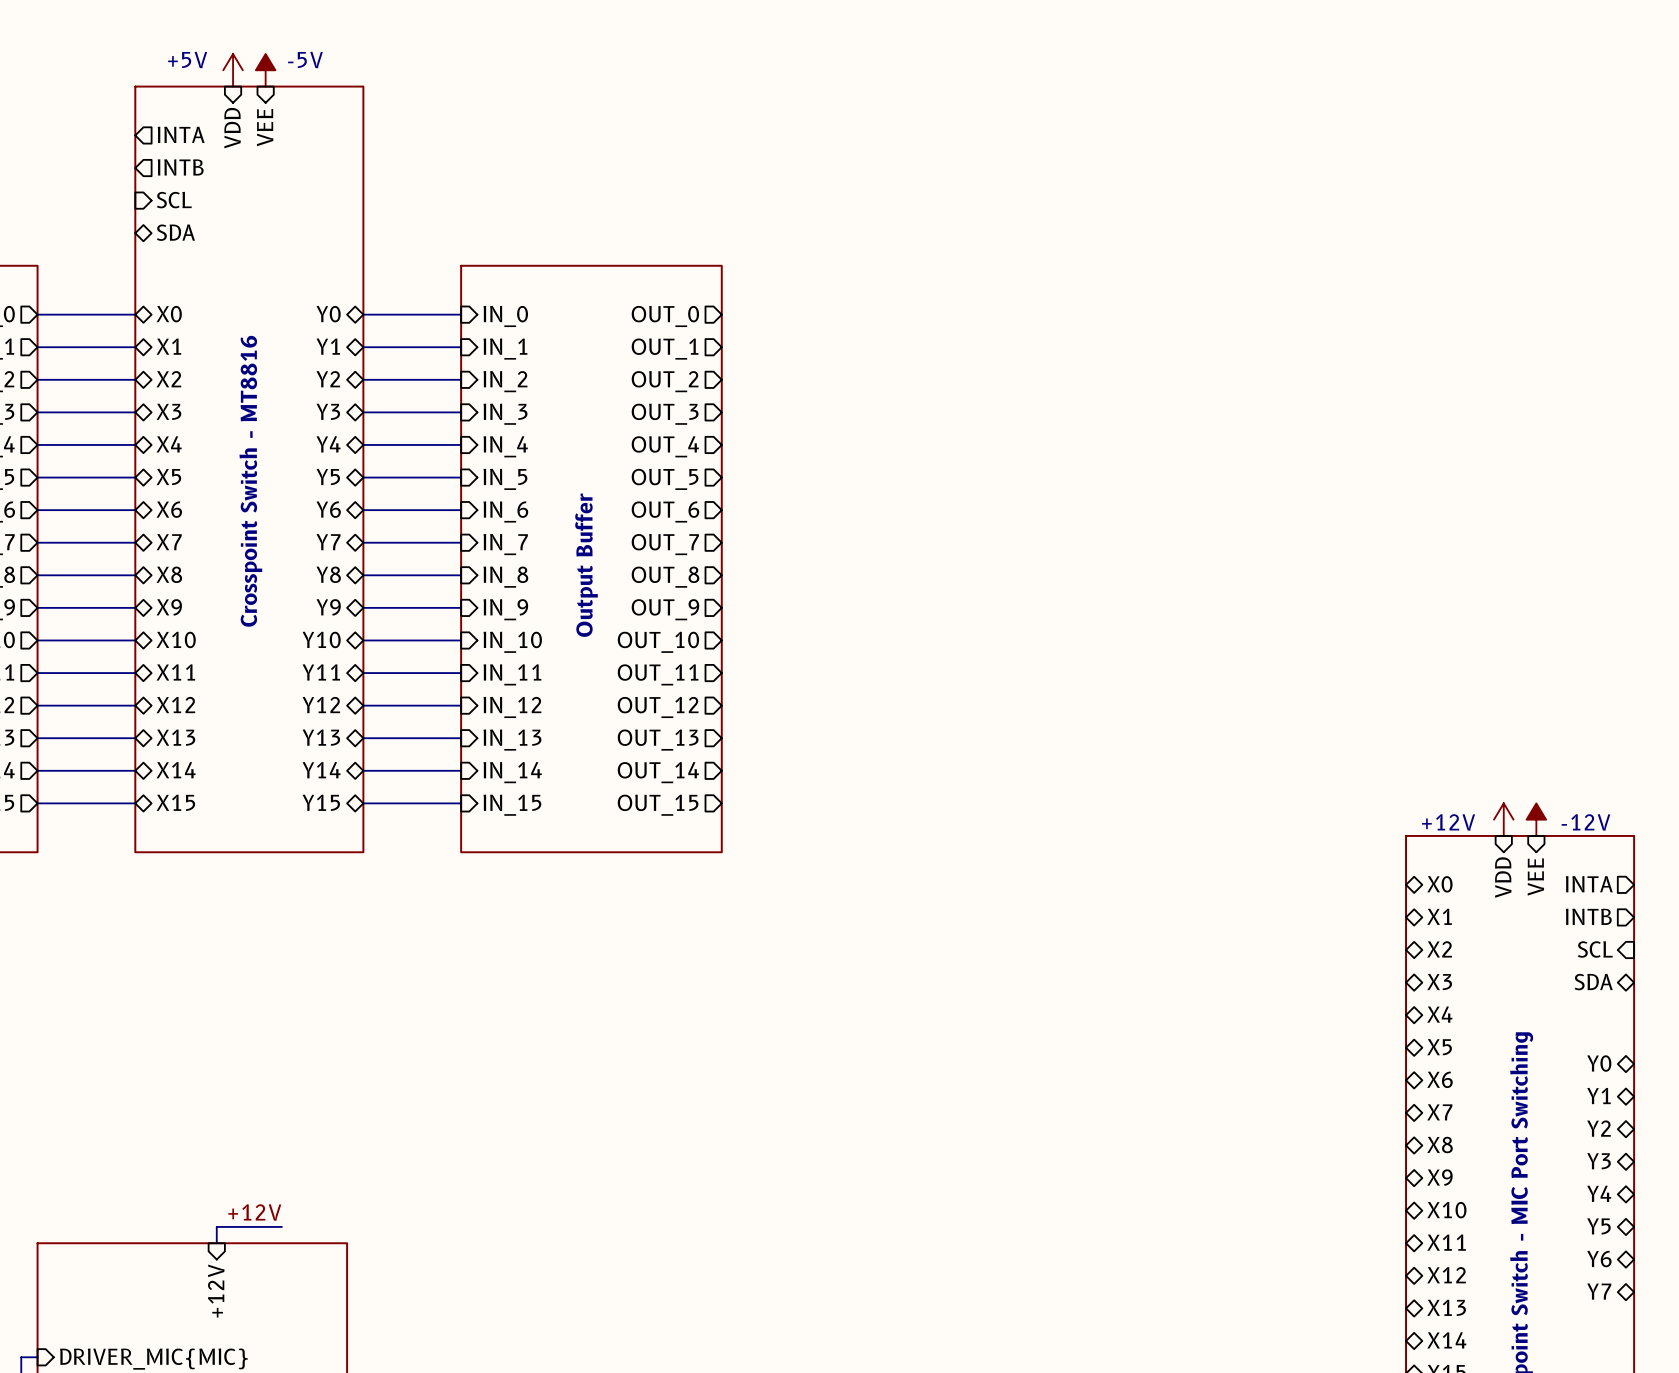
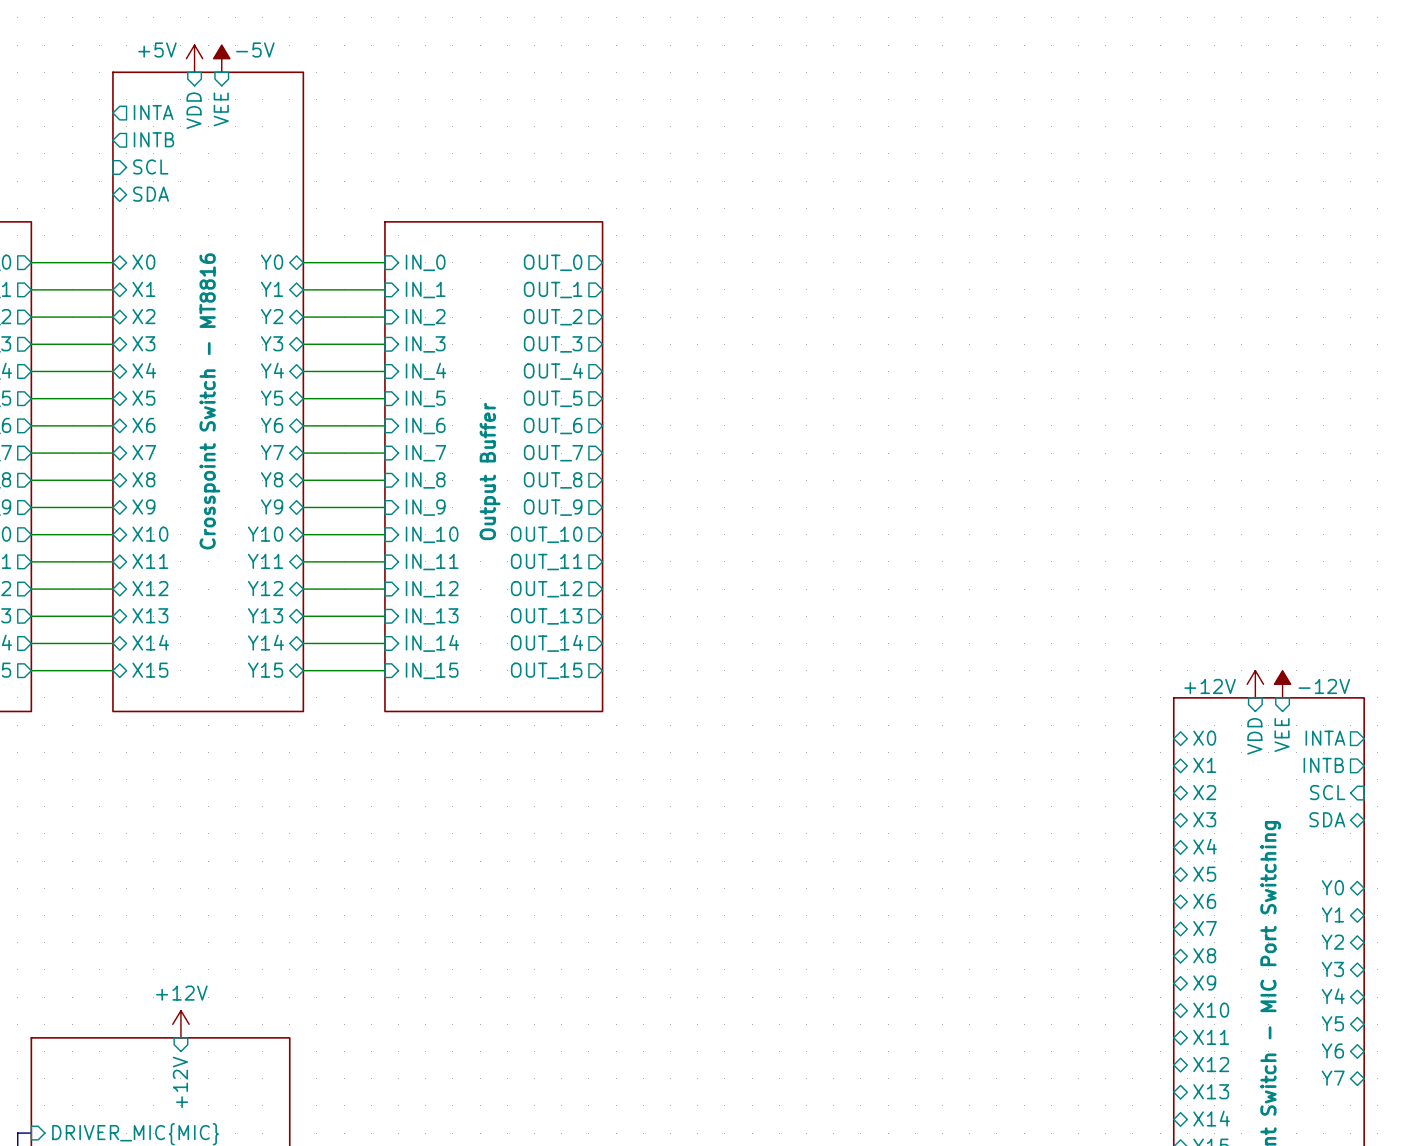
label: +12V (254, 1212) -> none
power symbol: none -> +12V (180, 1024)
wire: (281, 1226) (216, 1226) (216, 1243) -> none

